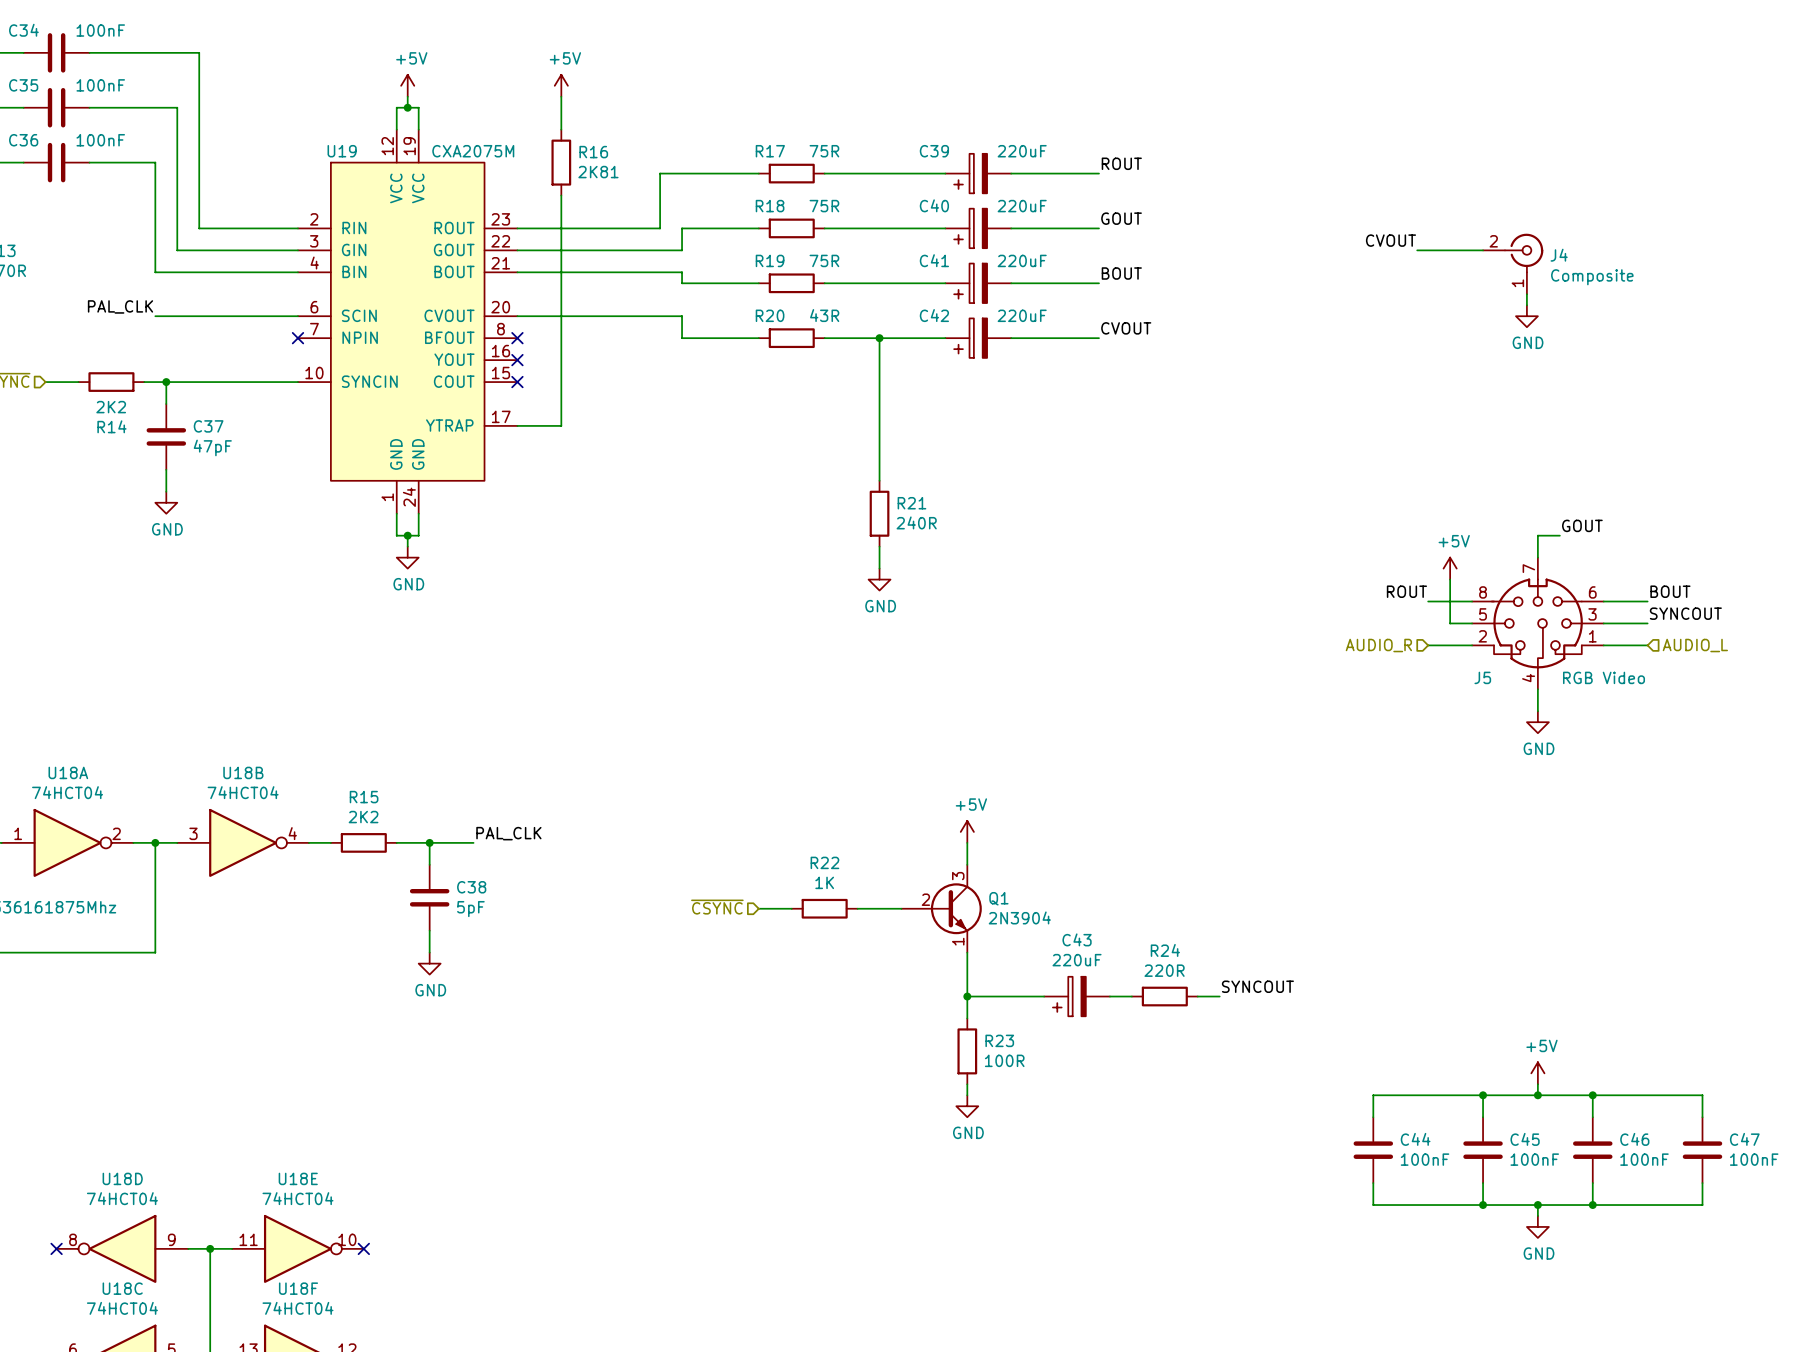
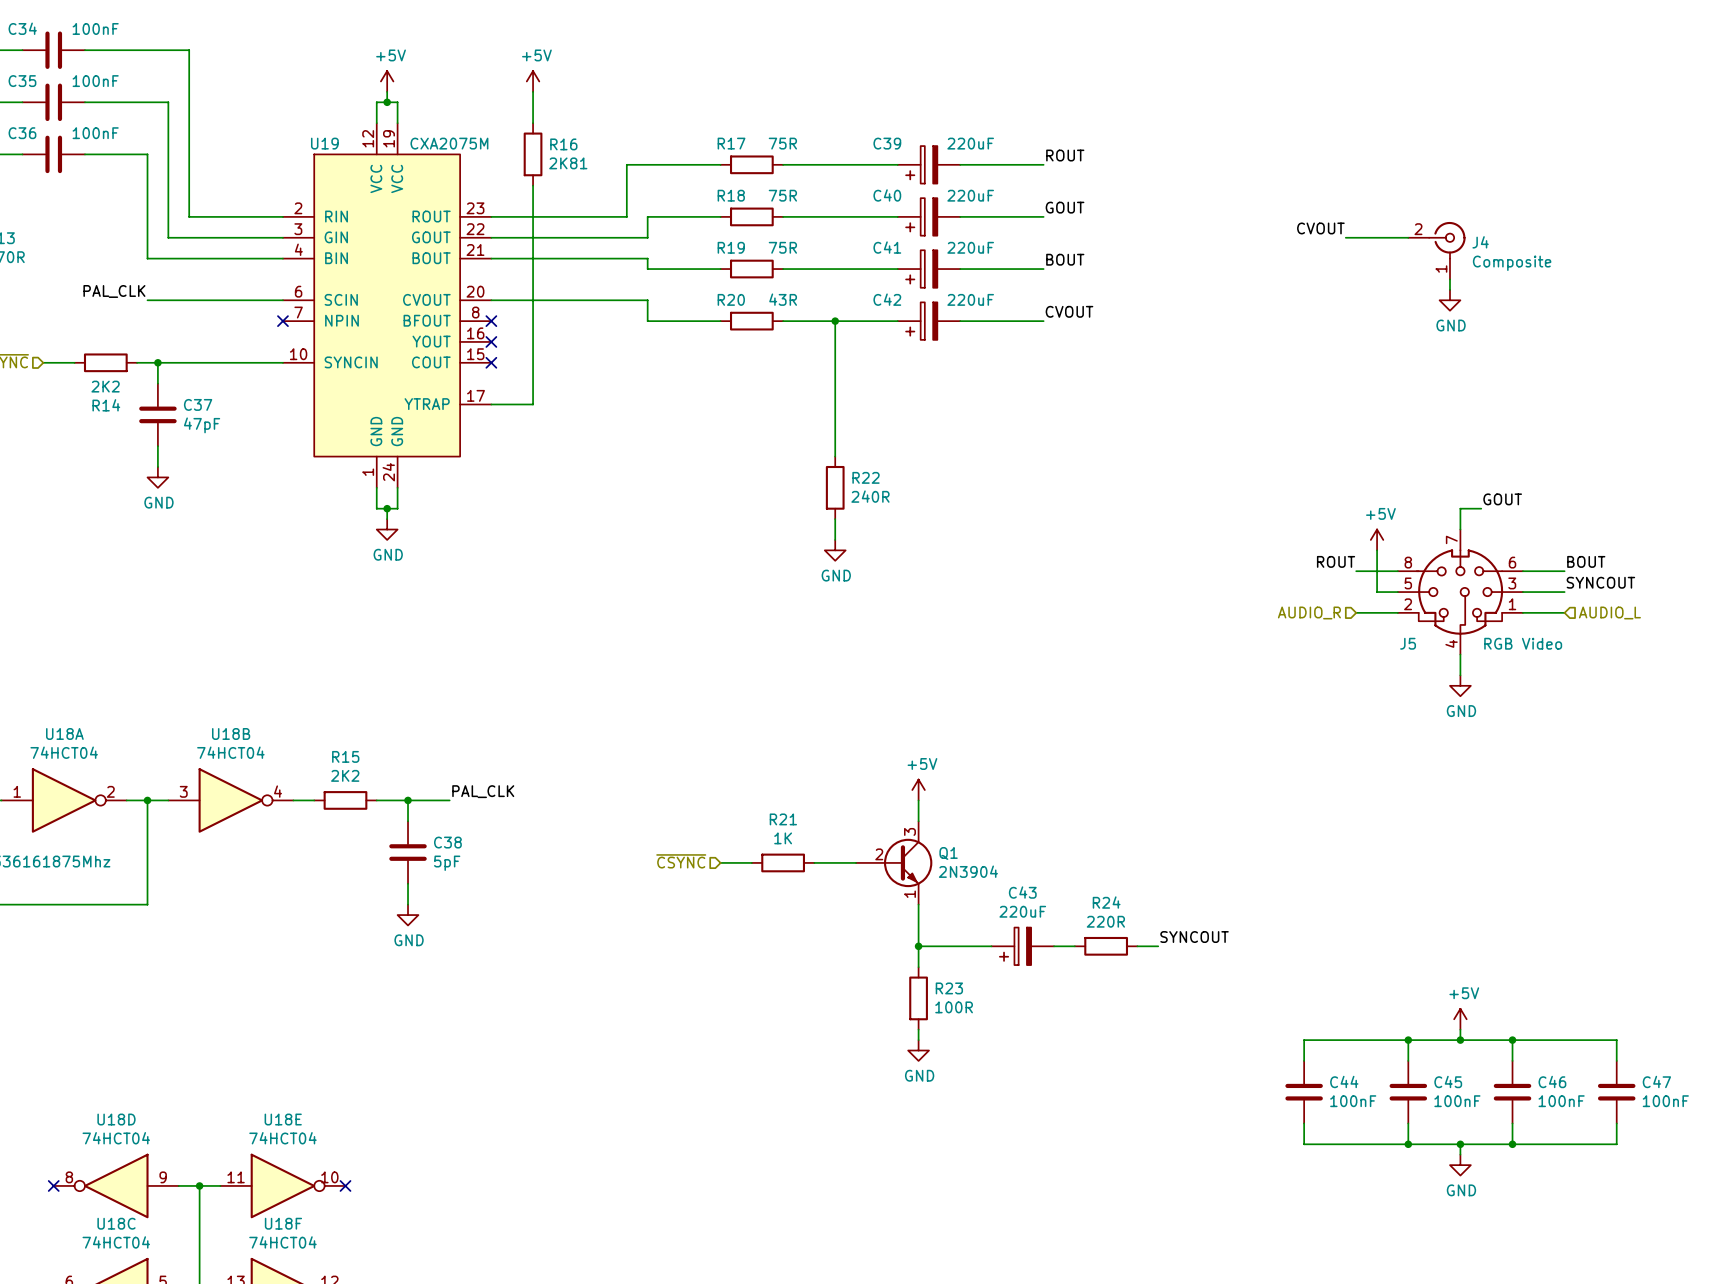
R21 name: R21 (911, 503) -> R22 (866, 477)
R22 name: R22 (824, 862) -> R21 (783, 819)

